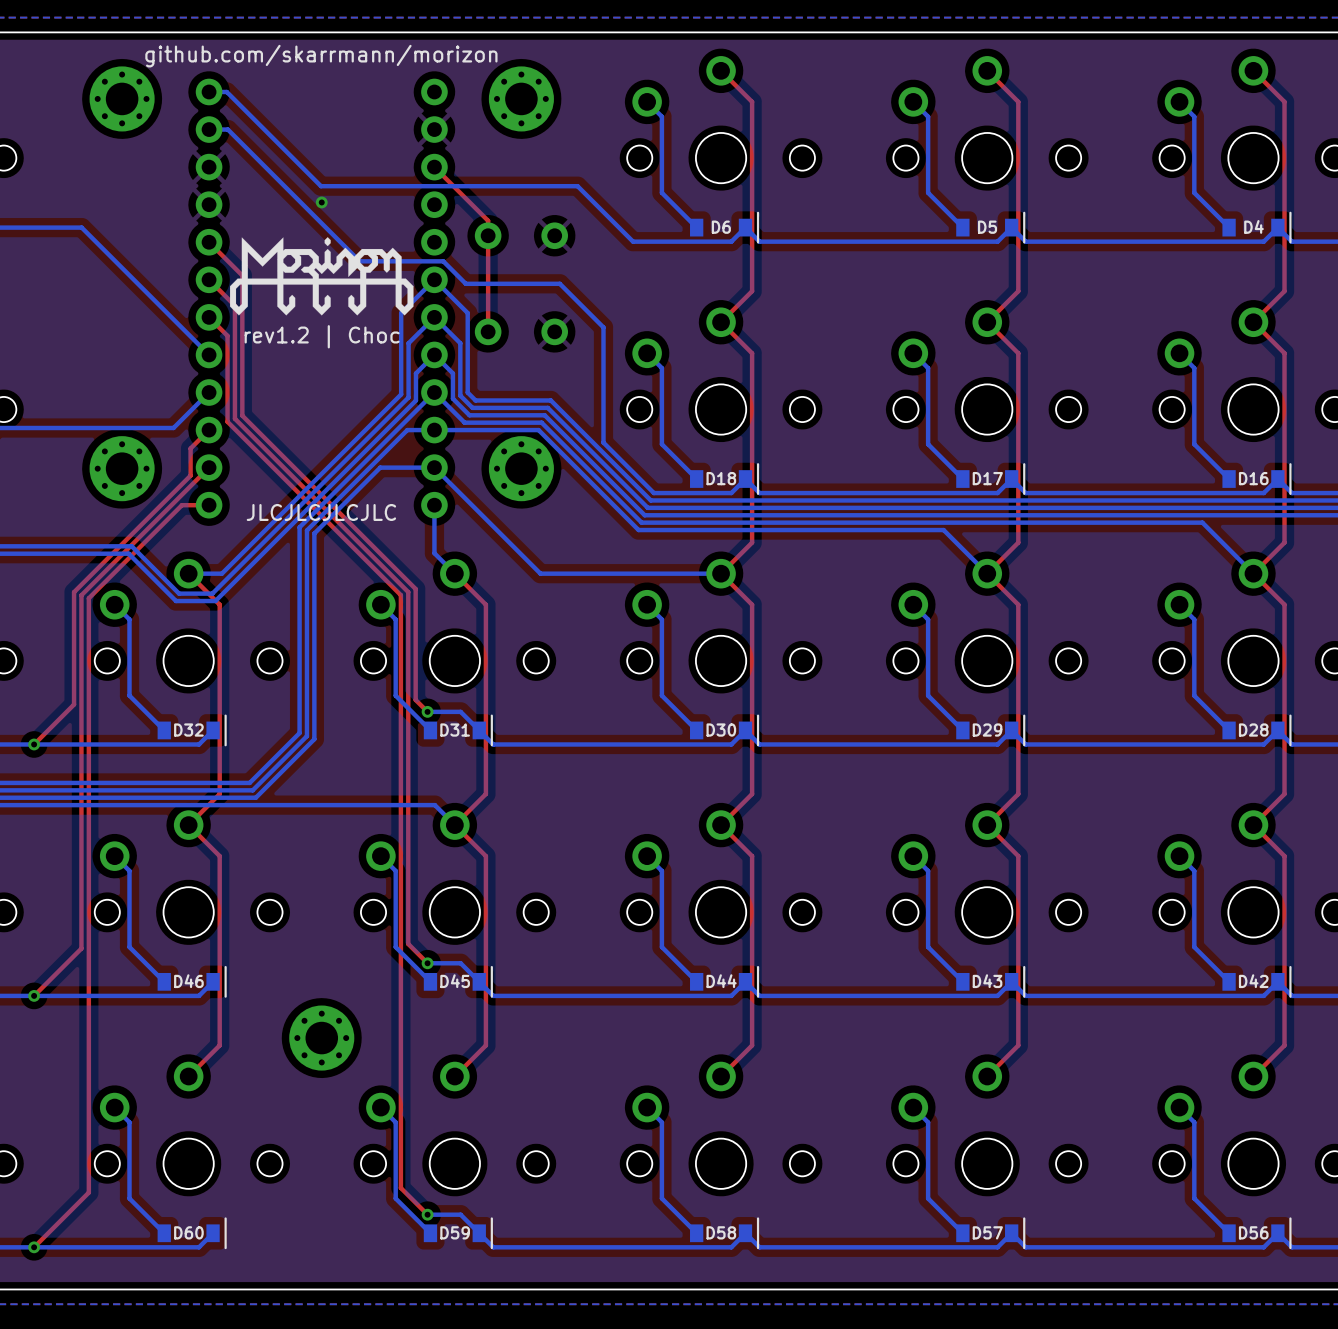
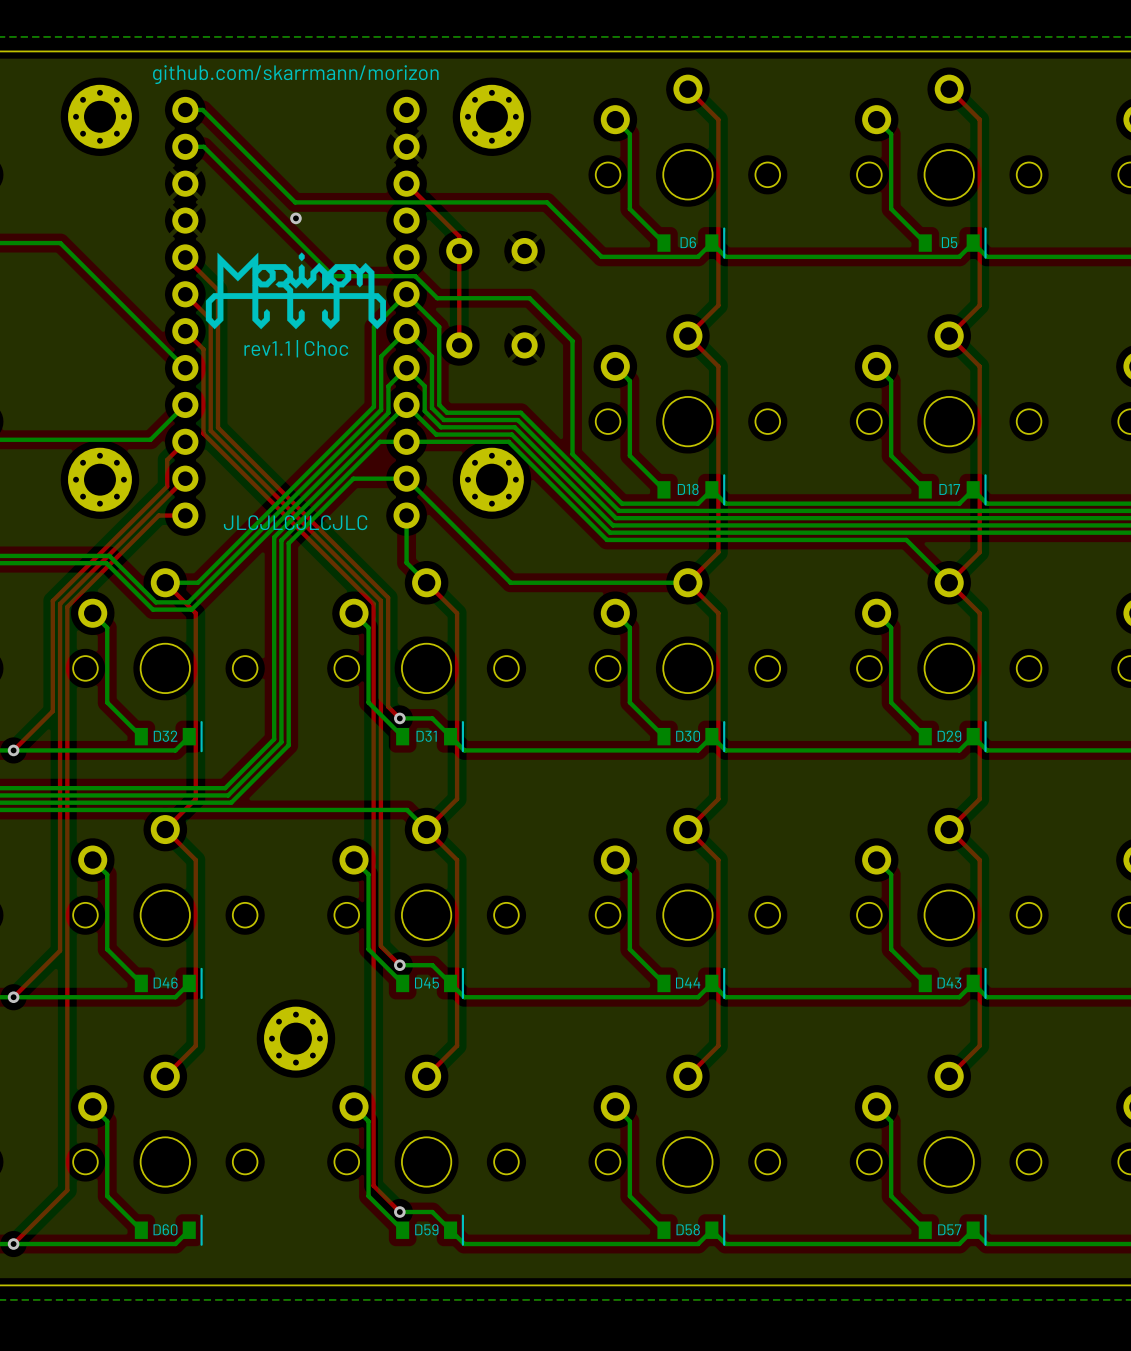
text: rev1.2 | Choc (322, 336) -> rev1.1 | Choc (296, 348)

